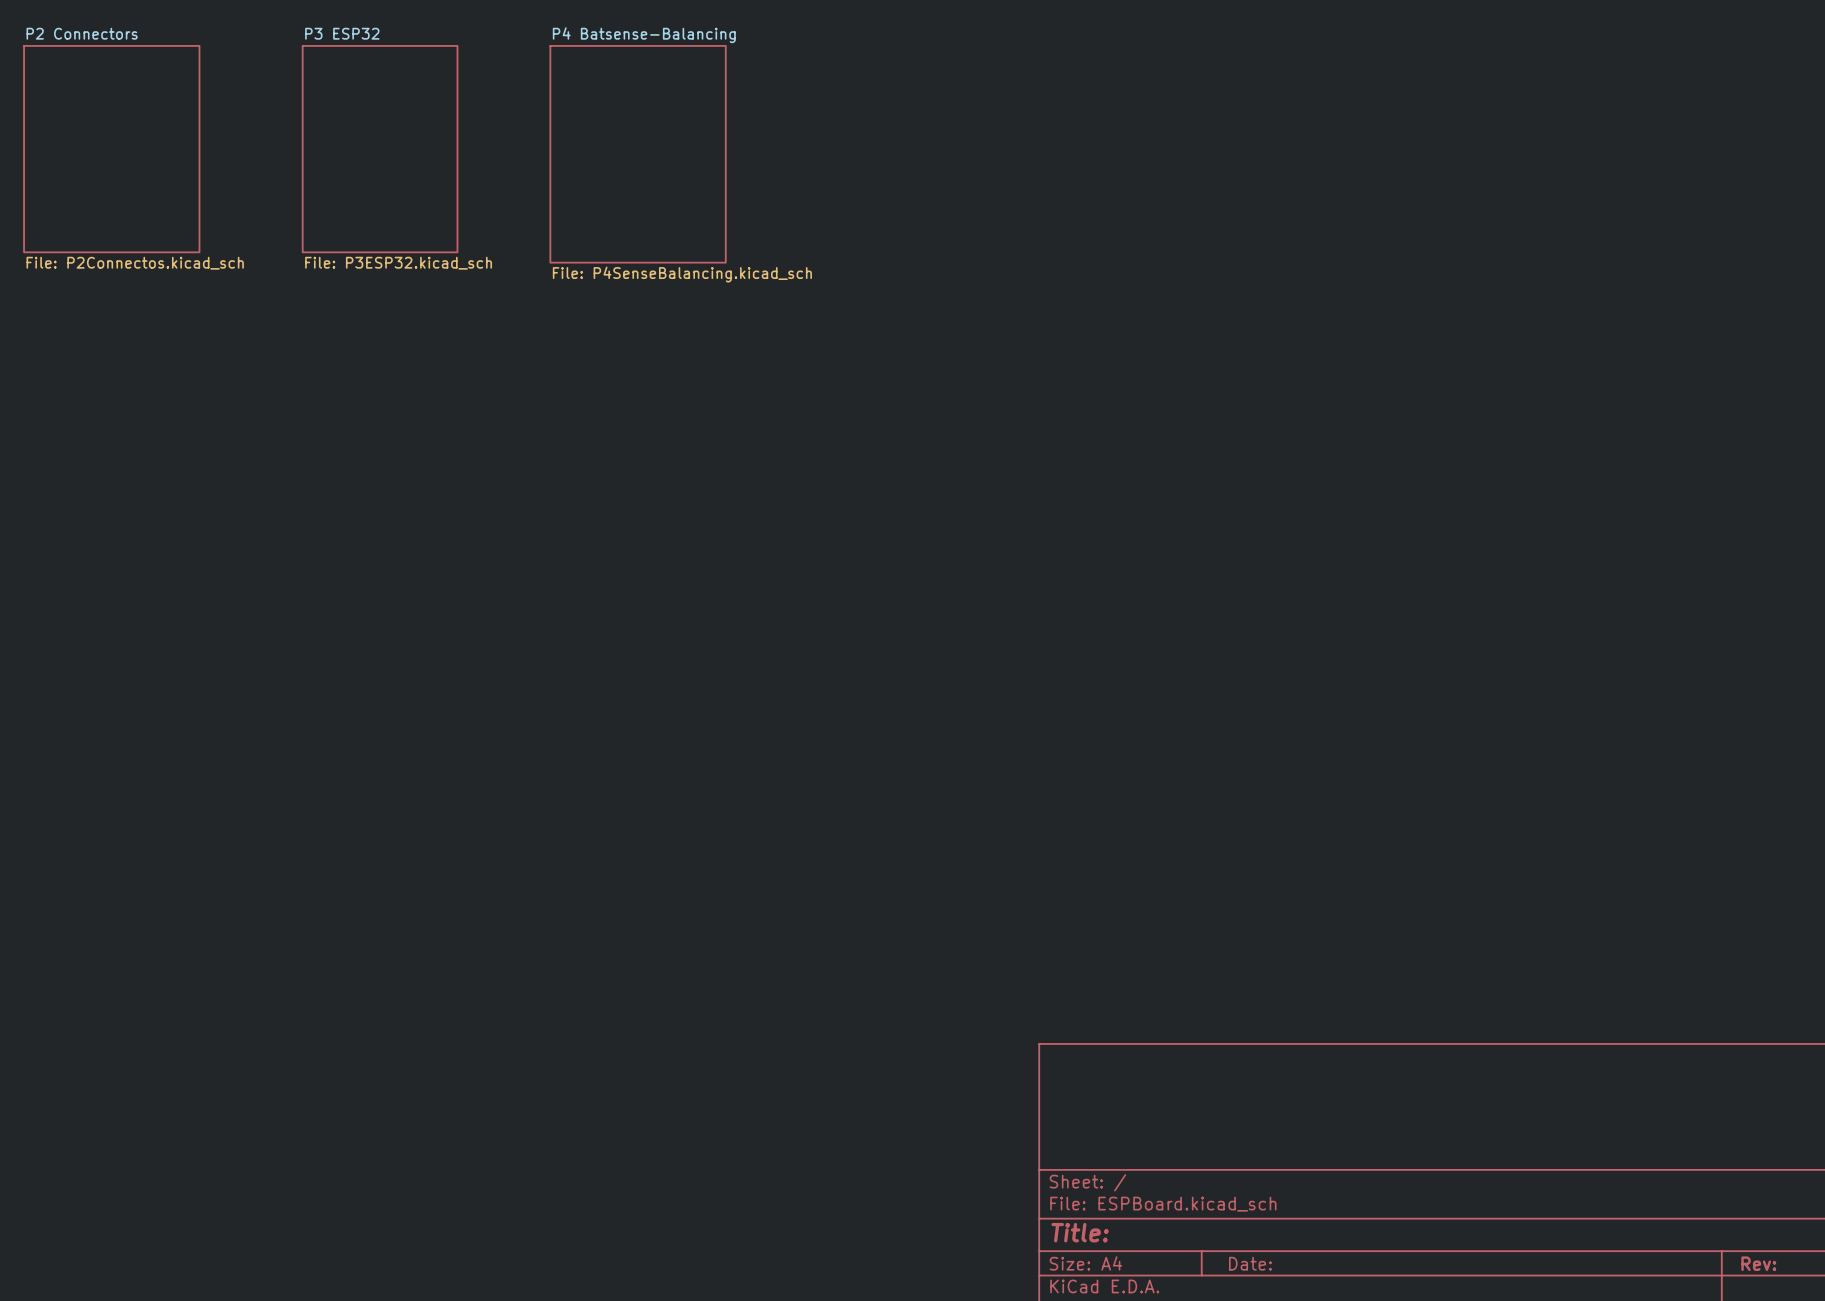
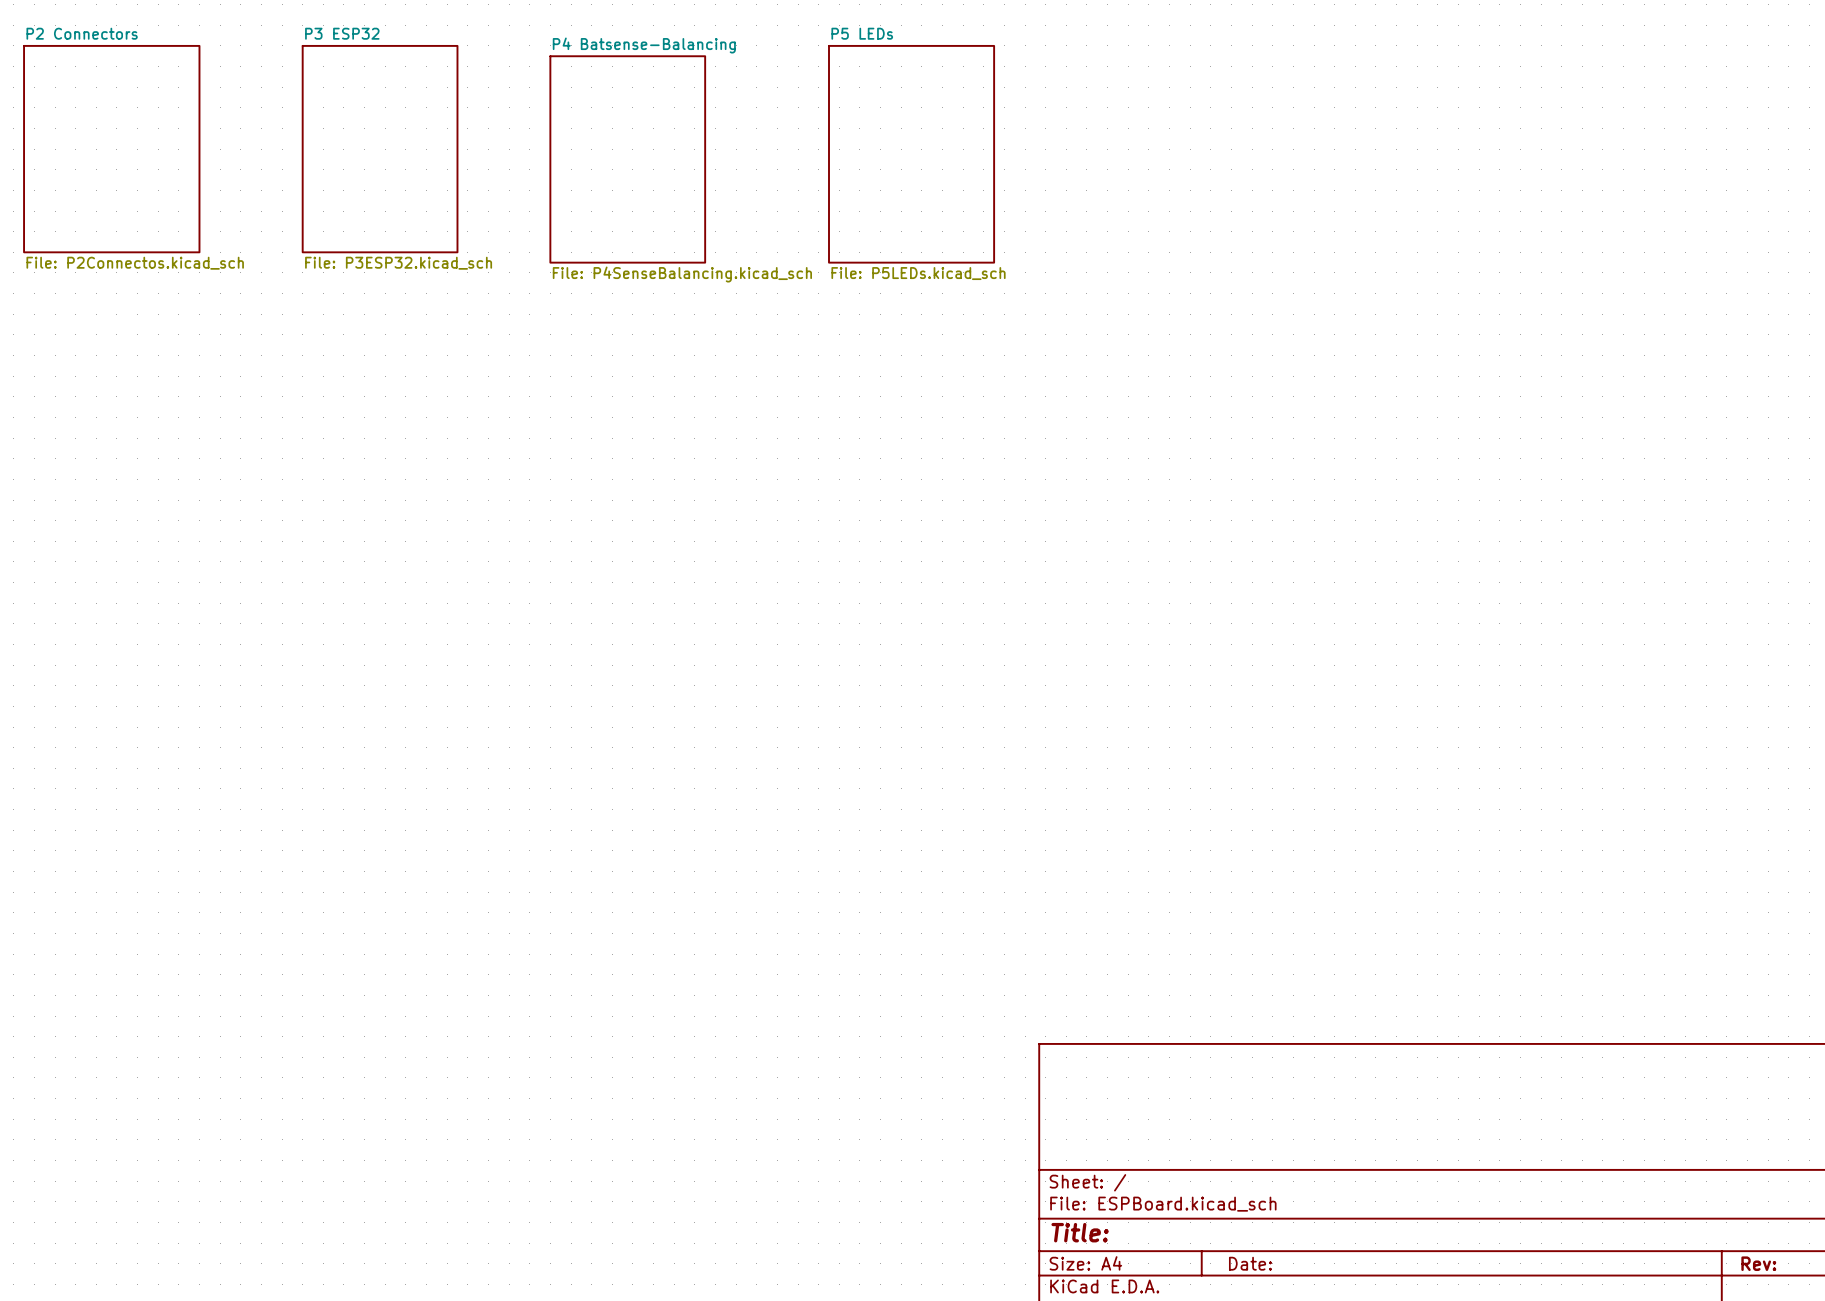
sheet P4 Batsense-Balancing shape: [549, 45, 727, 264] -> [549, 55, 706, 264]
sheet P5 LEDs: none -> File: P5LEDs.kicad_sch (911, 154)

